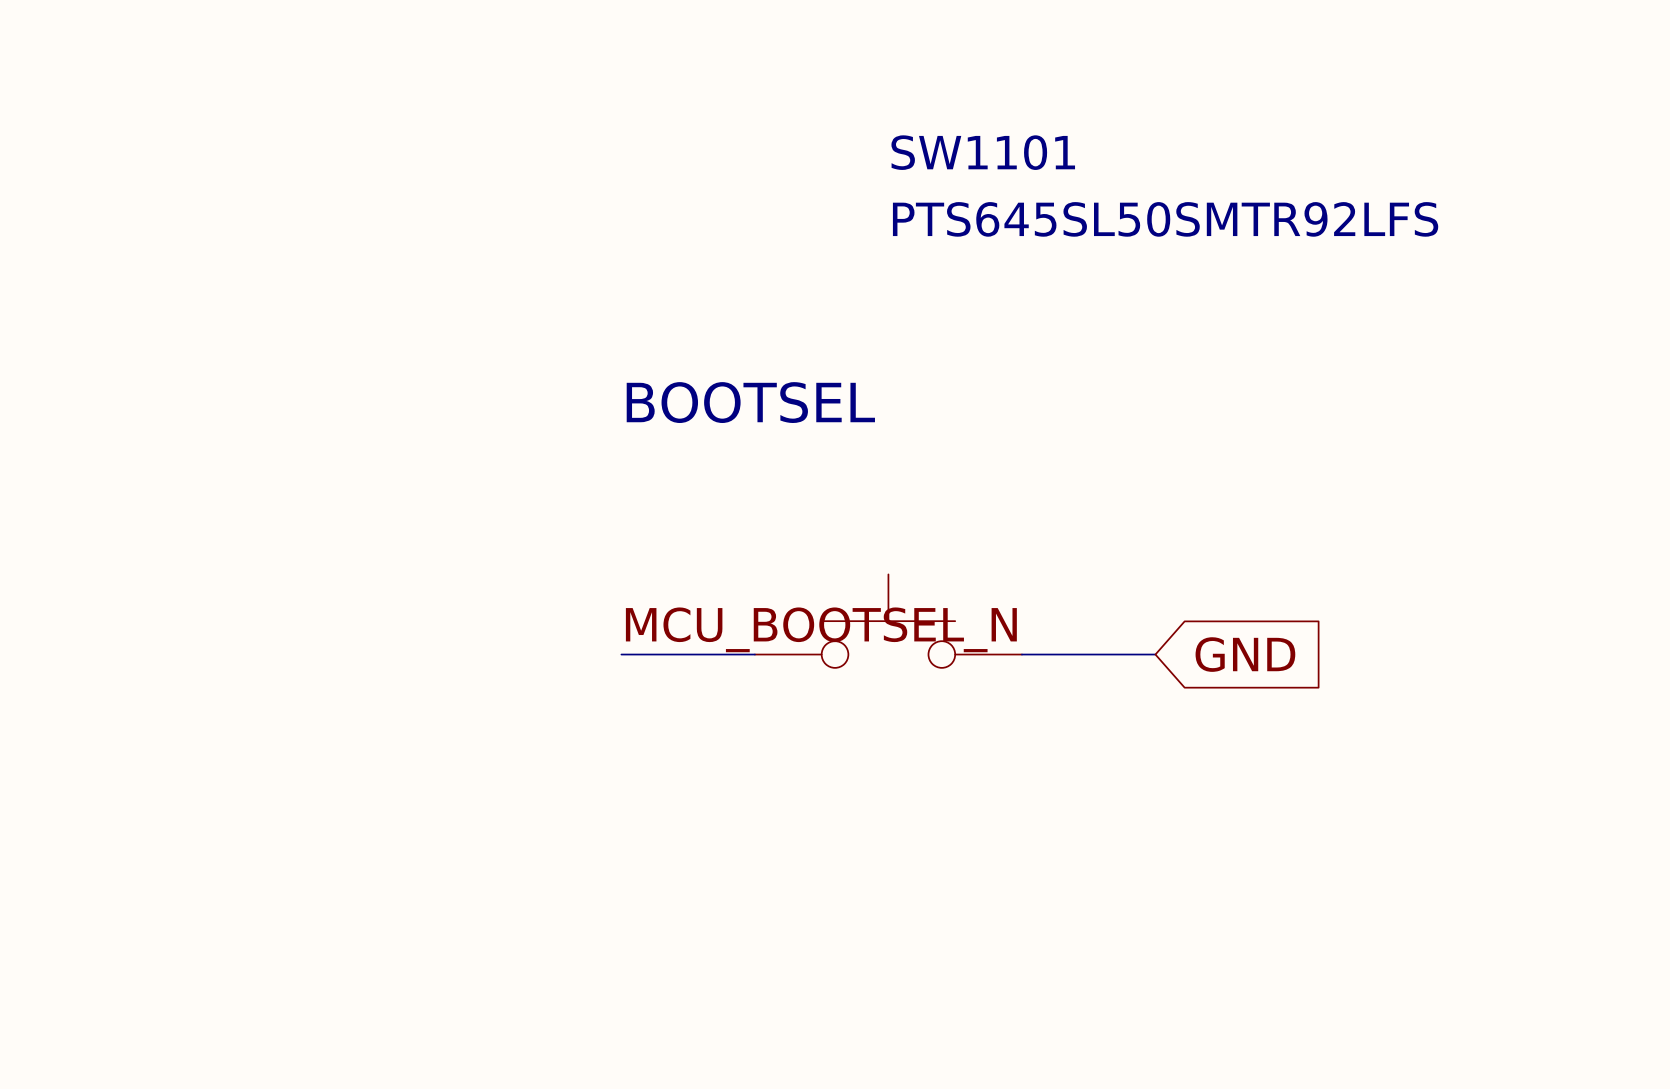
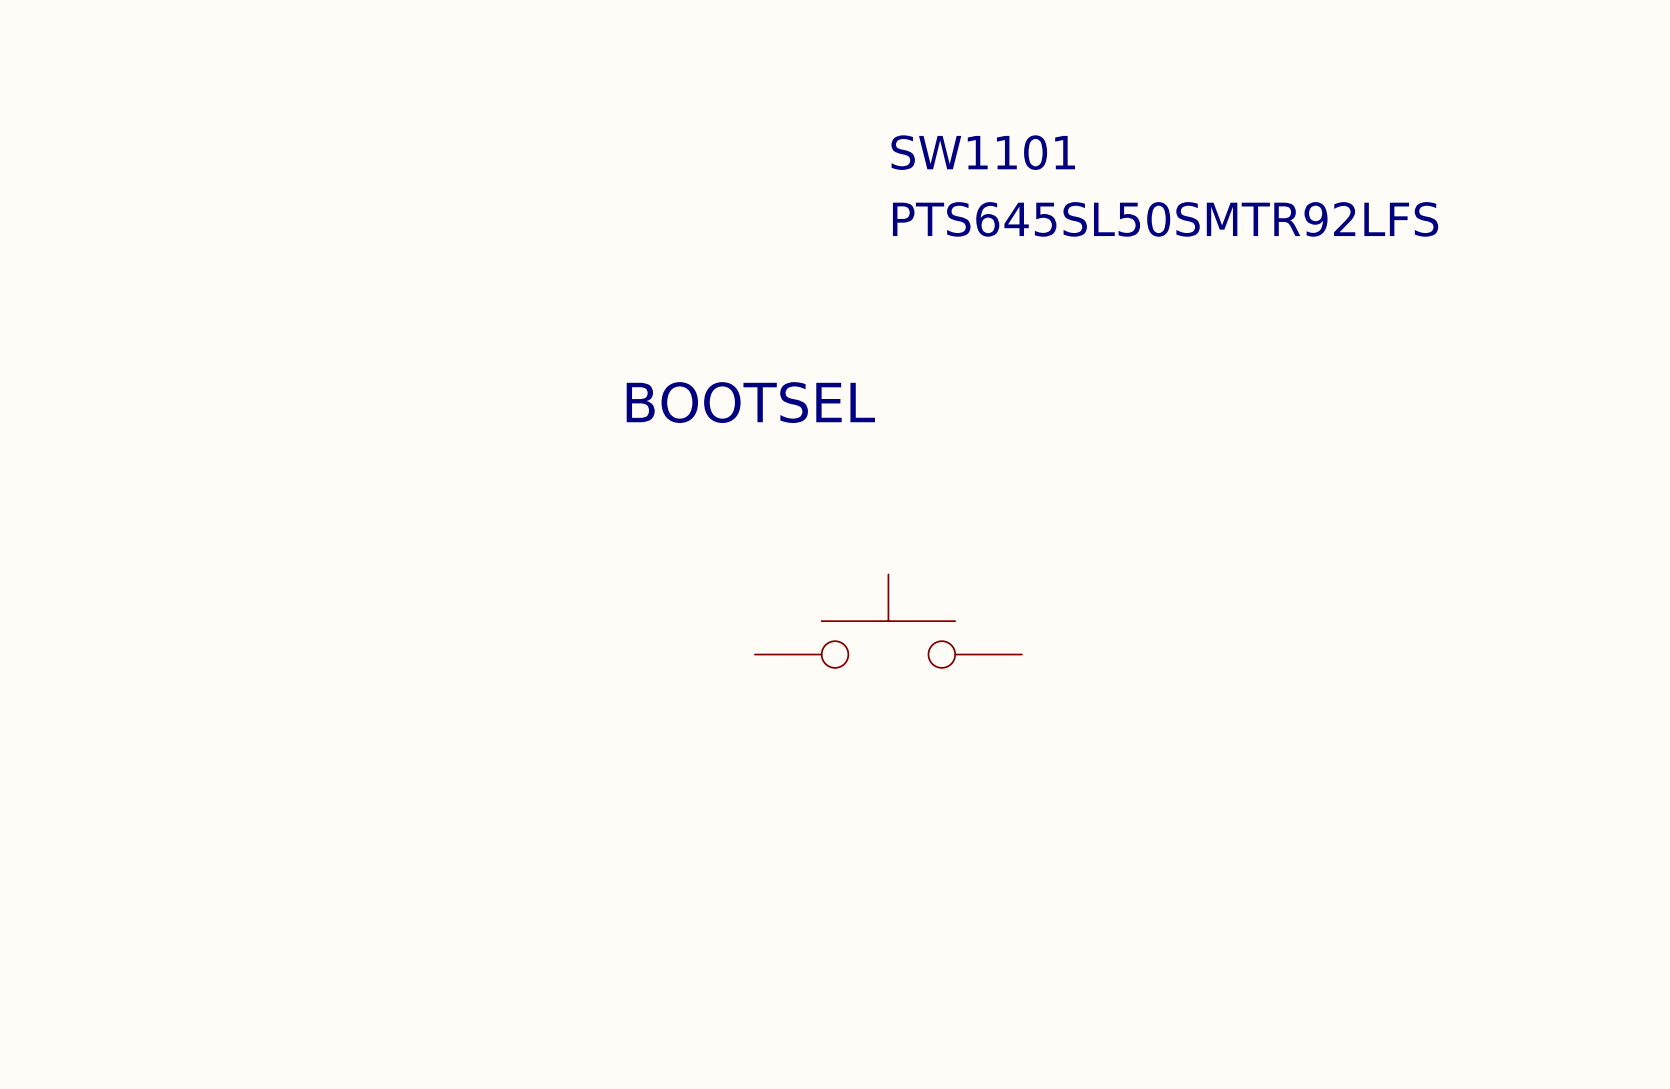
label: MCU_BOOTSEL_N (821, 629) -> none
wire: (621, 654) (754, 654) -> none
wire: (1021, 654) (1155, 654) -> none
global label: GND (1245, 654) -> none

